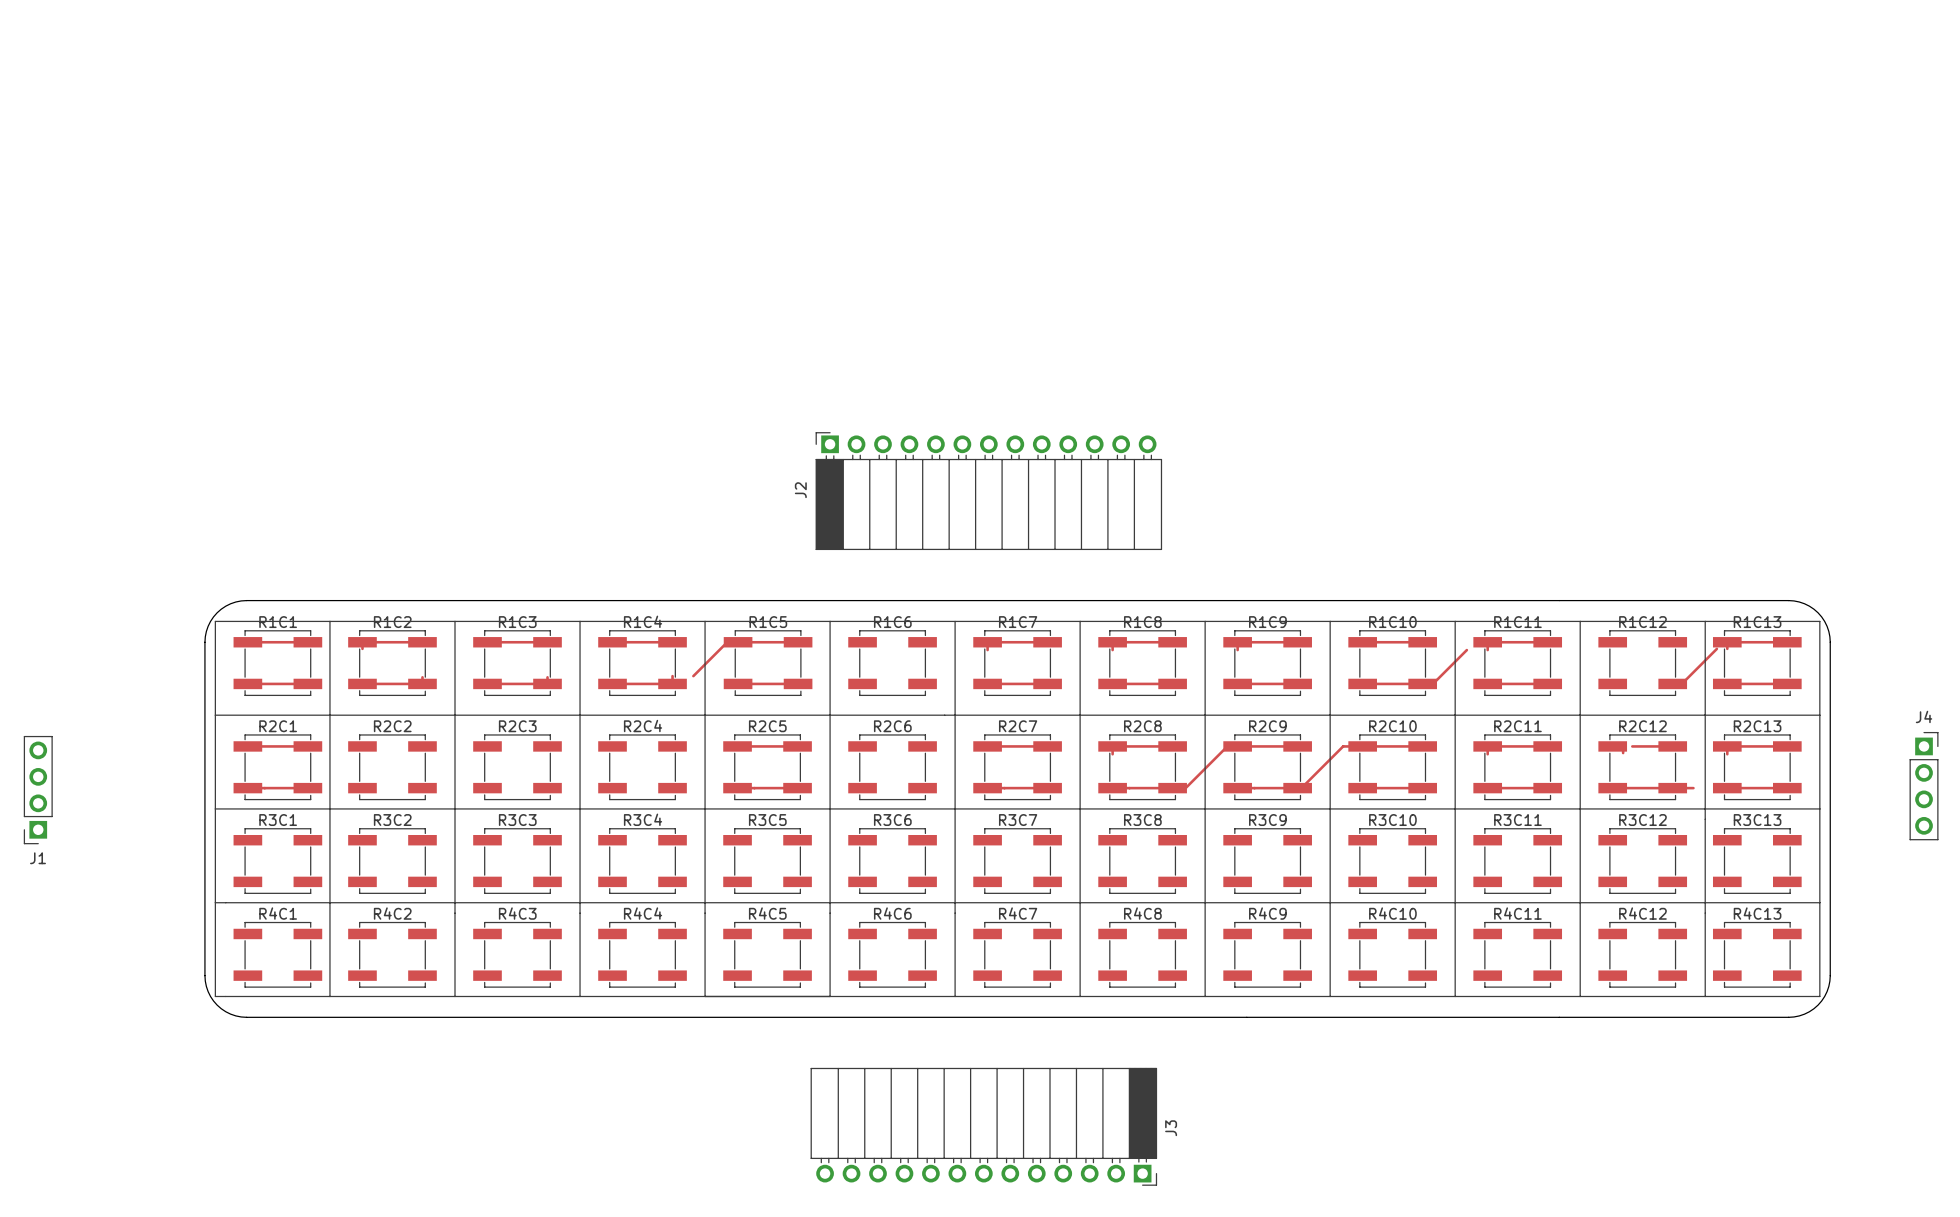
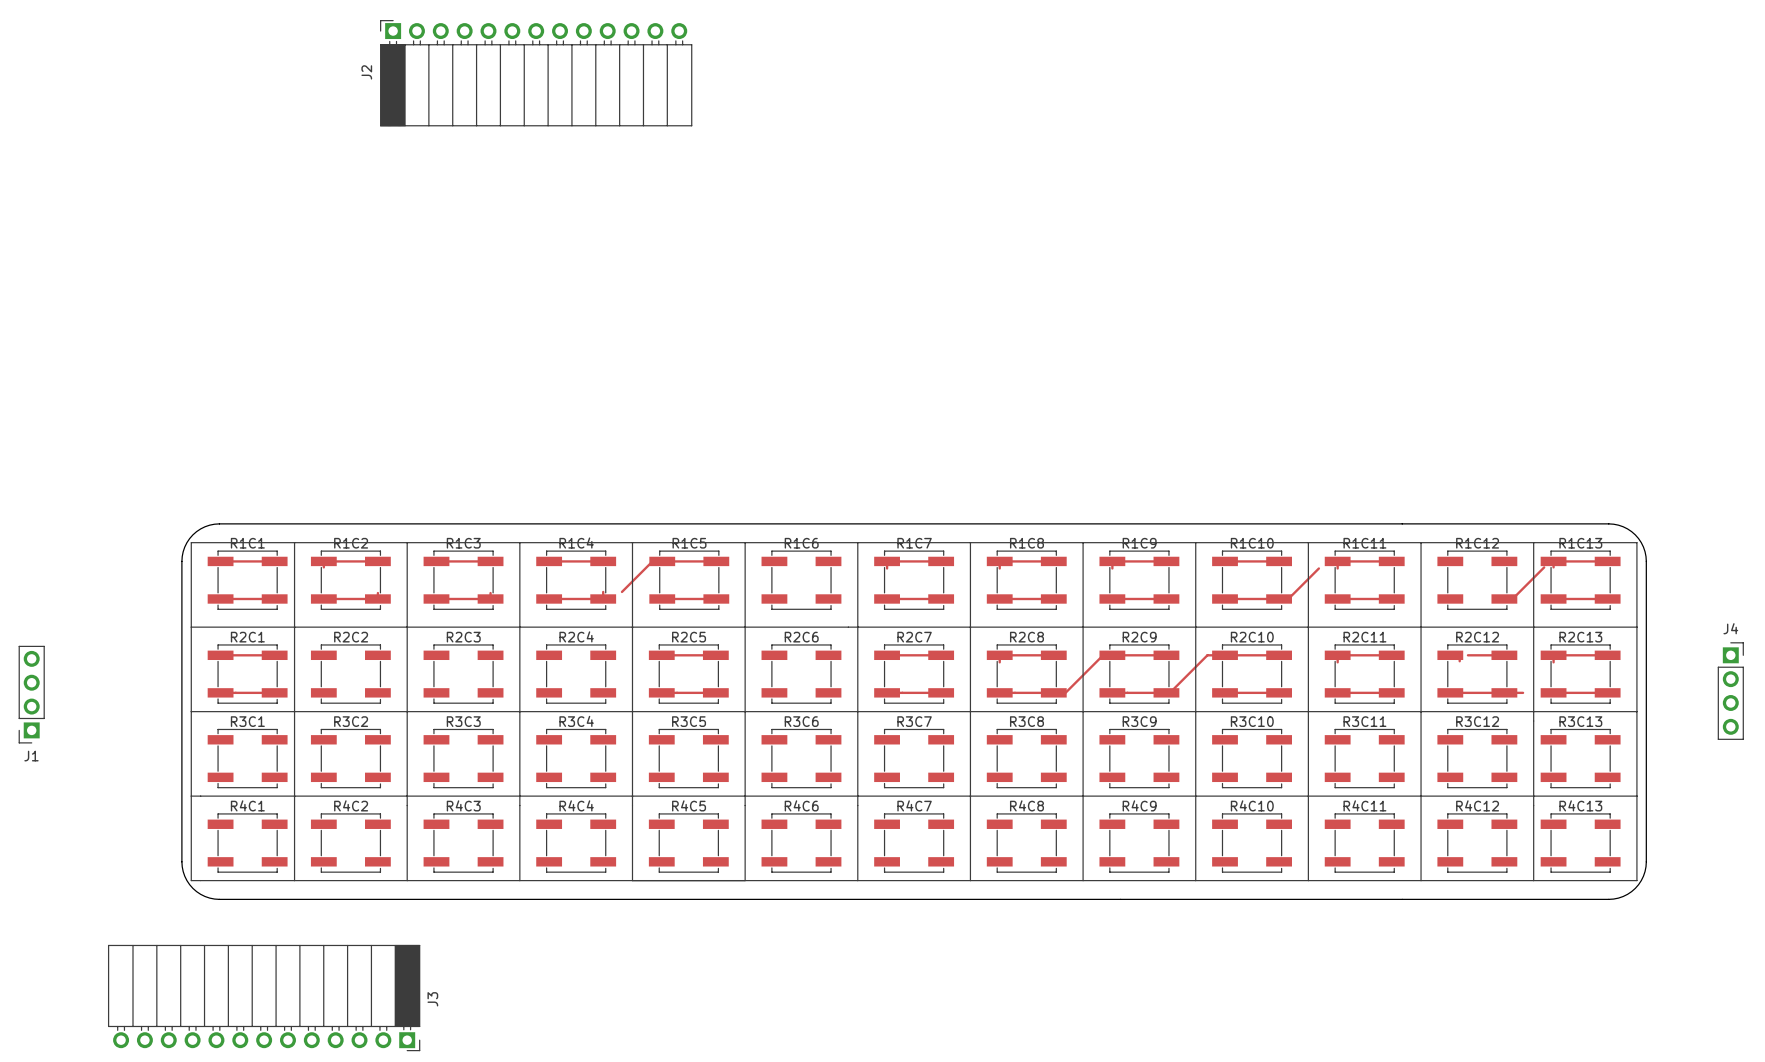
J2 position: (988, 491) -> (536, 73)
J3 position: (983, 1126) -> (264, 998)

